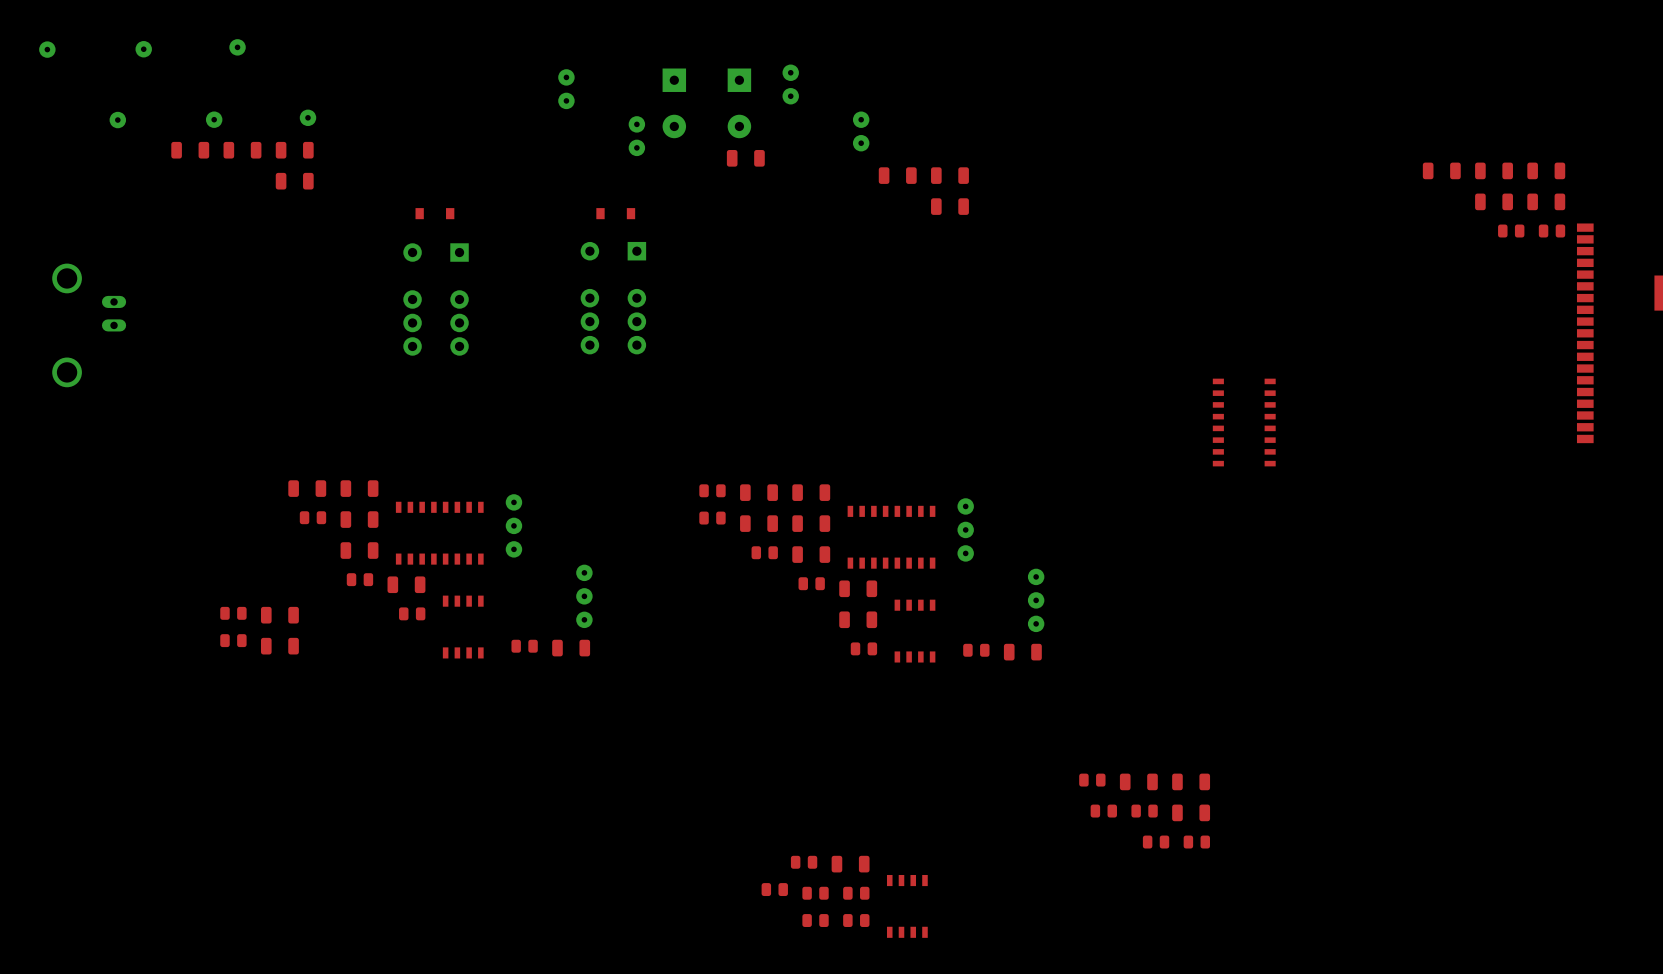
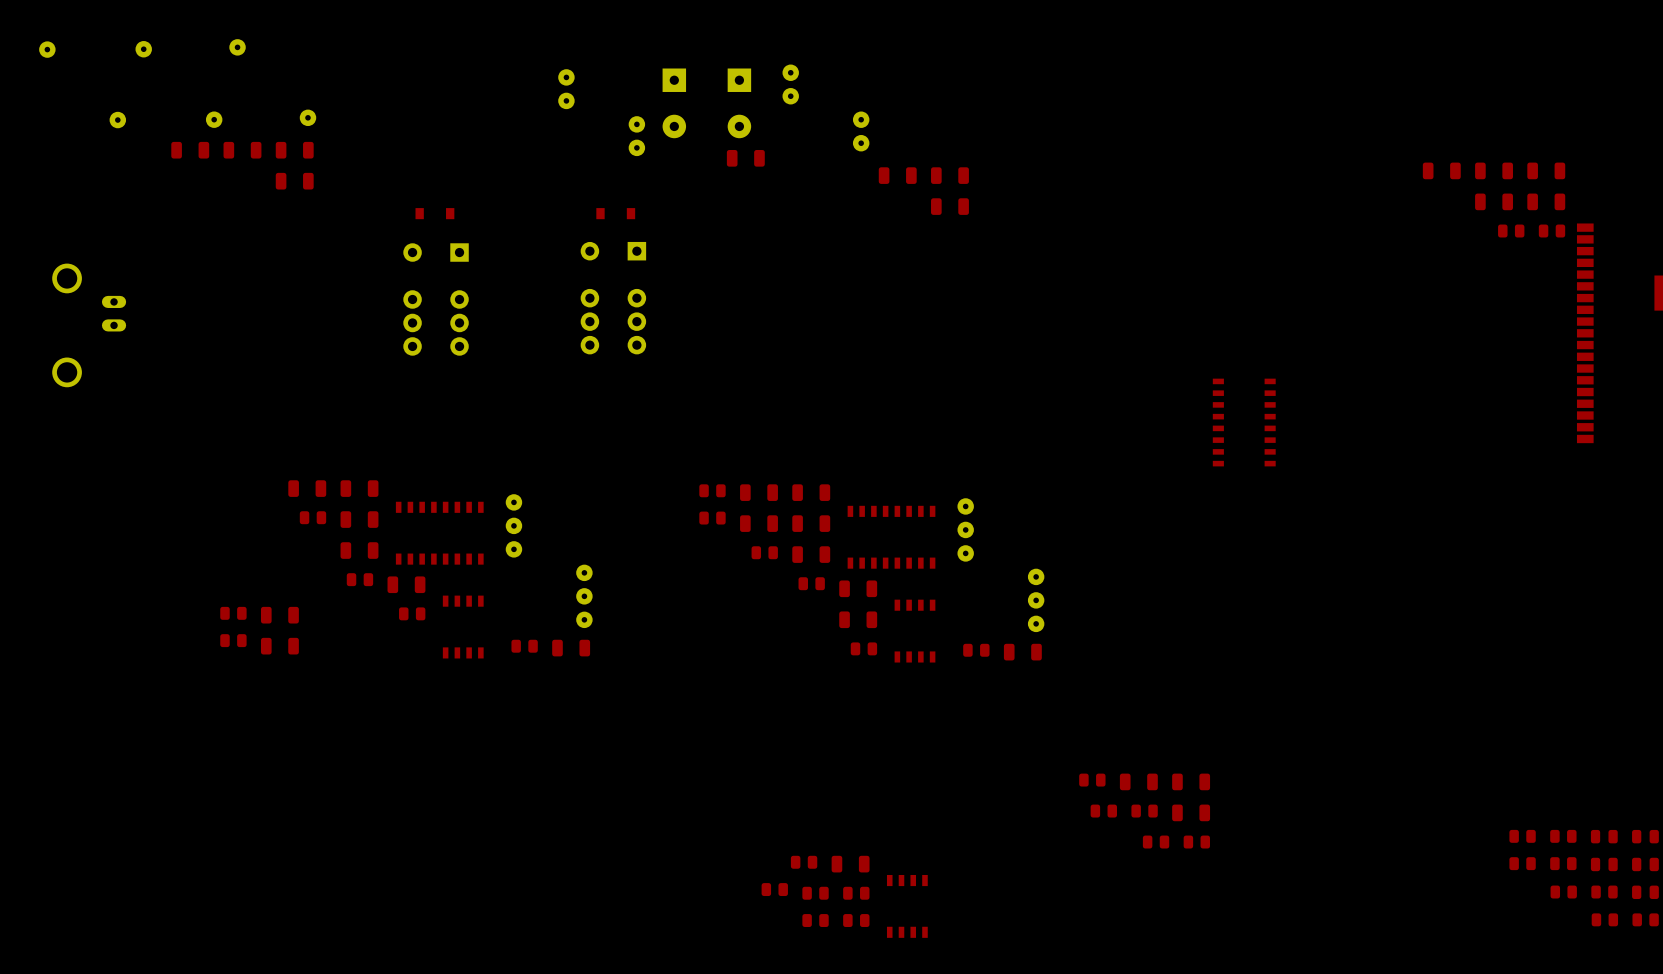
part: none -> (1522, 836)
part: none -> (1563, 836)
part: none -> (1604, 836)
part: none -> (1645, 836)
part: none -> (1522, 863)
part: none -> (1563, 863)
part: none -> (1604, 864)
part: none -> (1645, 864)
part: none -> (1563, 892)
part: none -> (1604, 892)
part: none -> (1645, 892)
part: none -> (1604, 919)
part: none -> (1645, 919)

